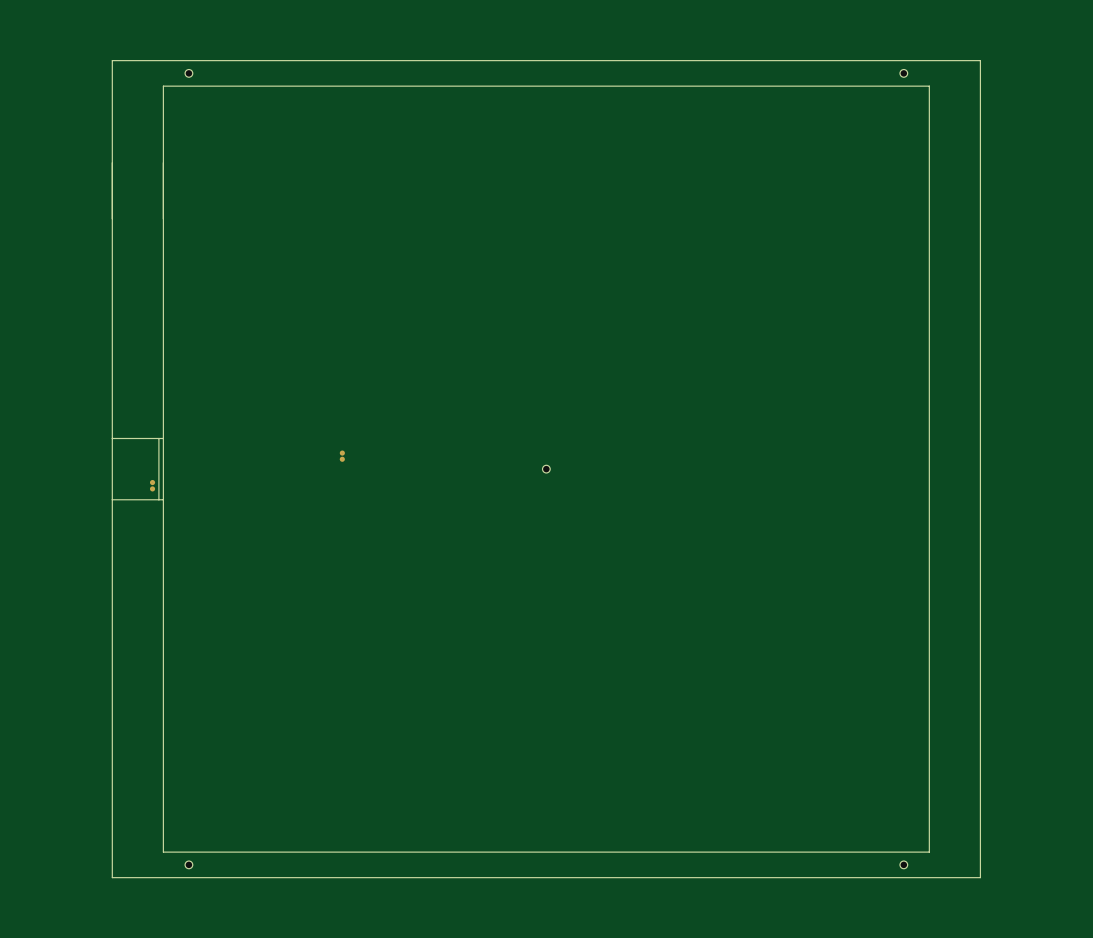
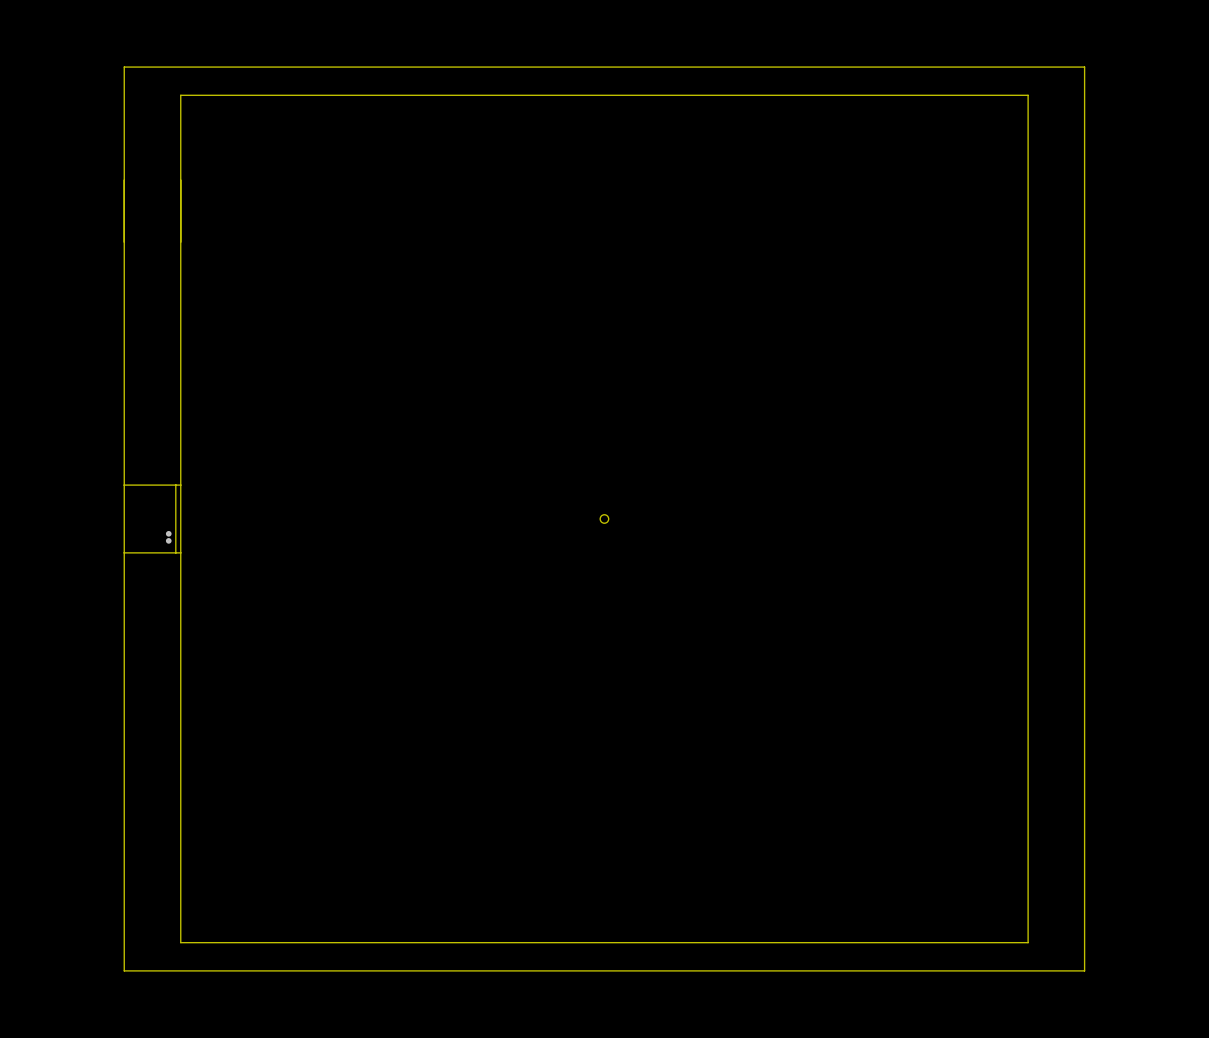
hole: (188, 73) -> none
hole: (903, 73) -> none
via: (342, 453) -> none
via: (342, 459) -> none
hole: (188, 864) -> none
hole: (903, 864) -> none

